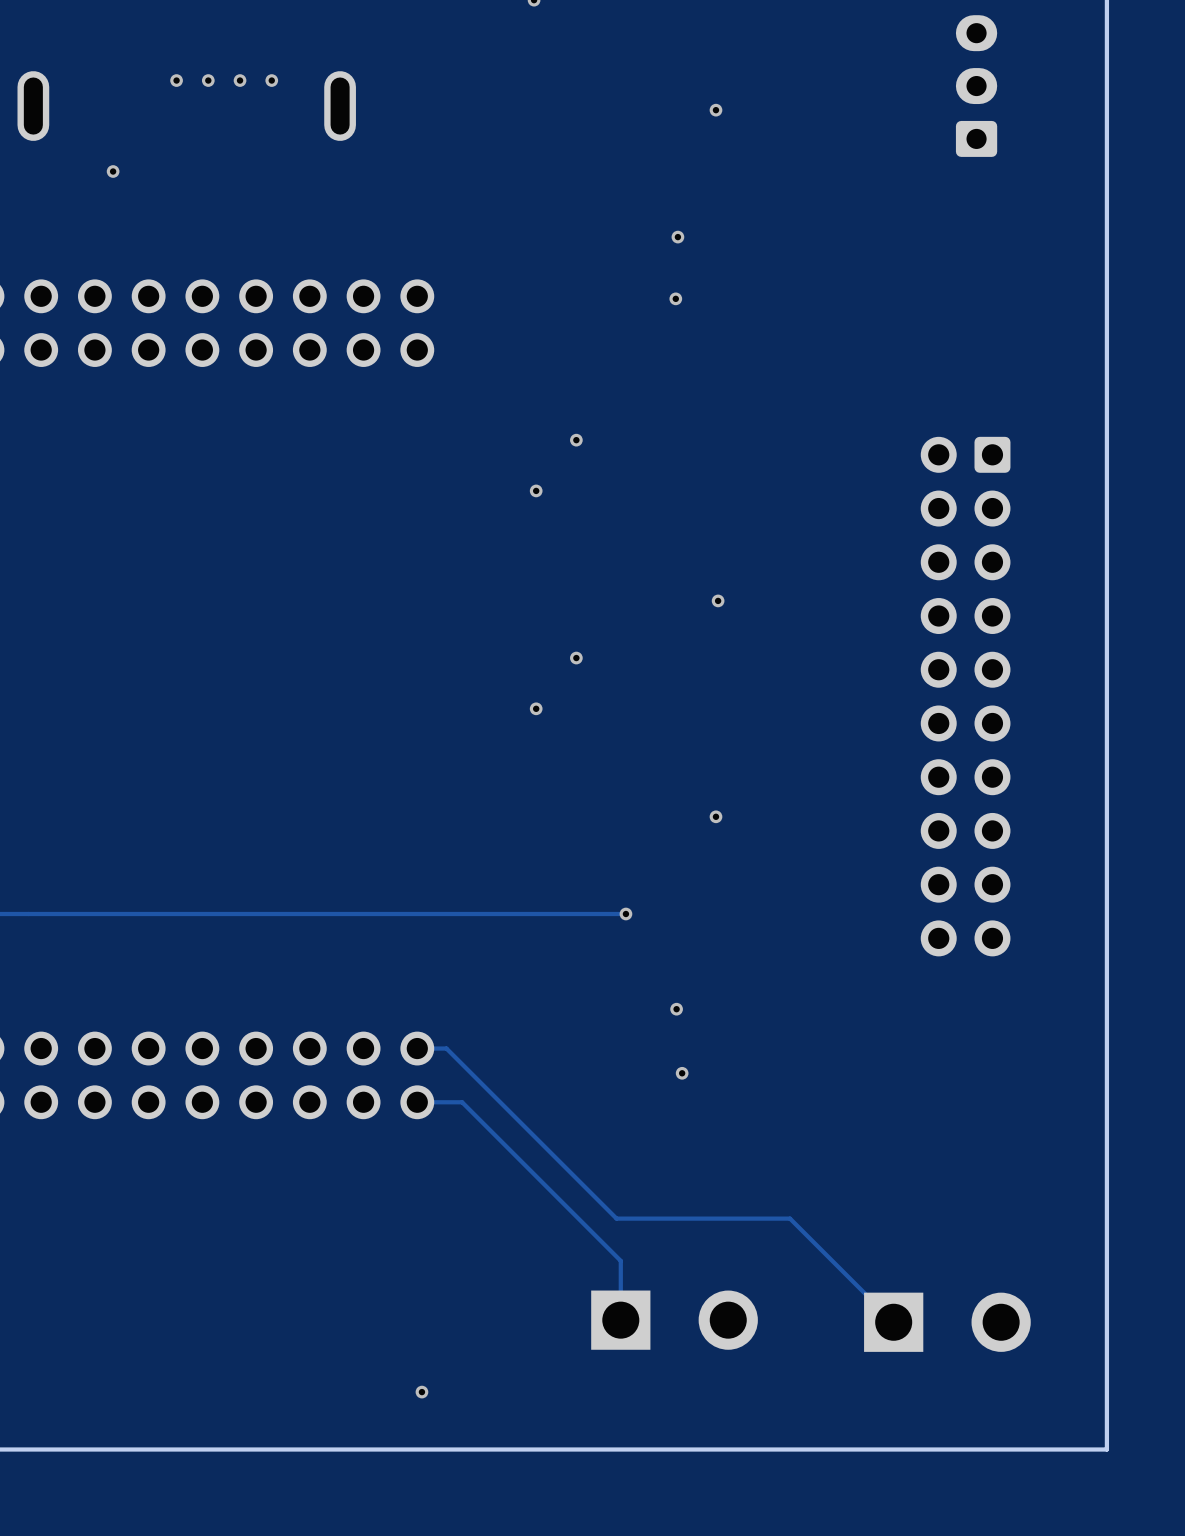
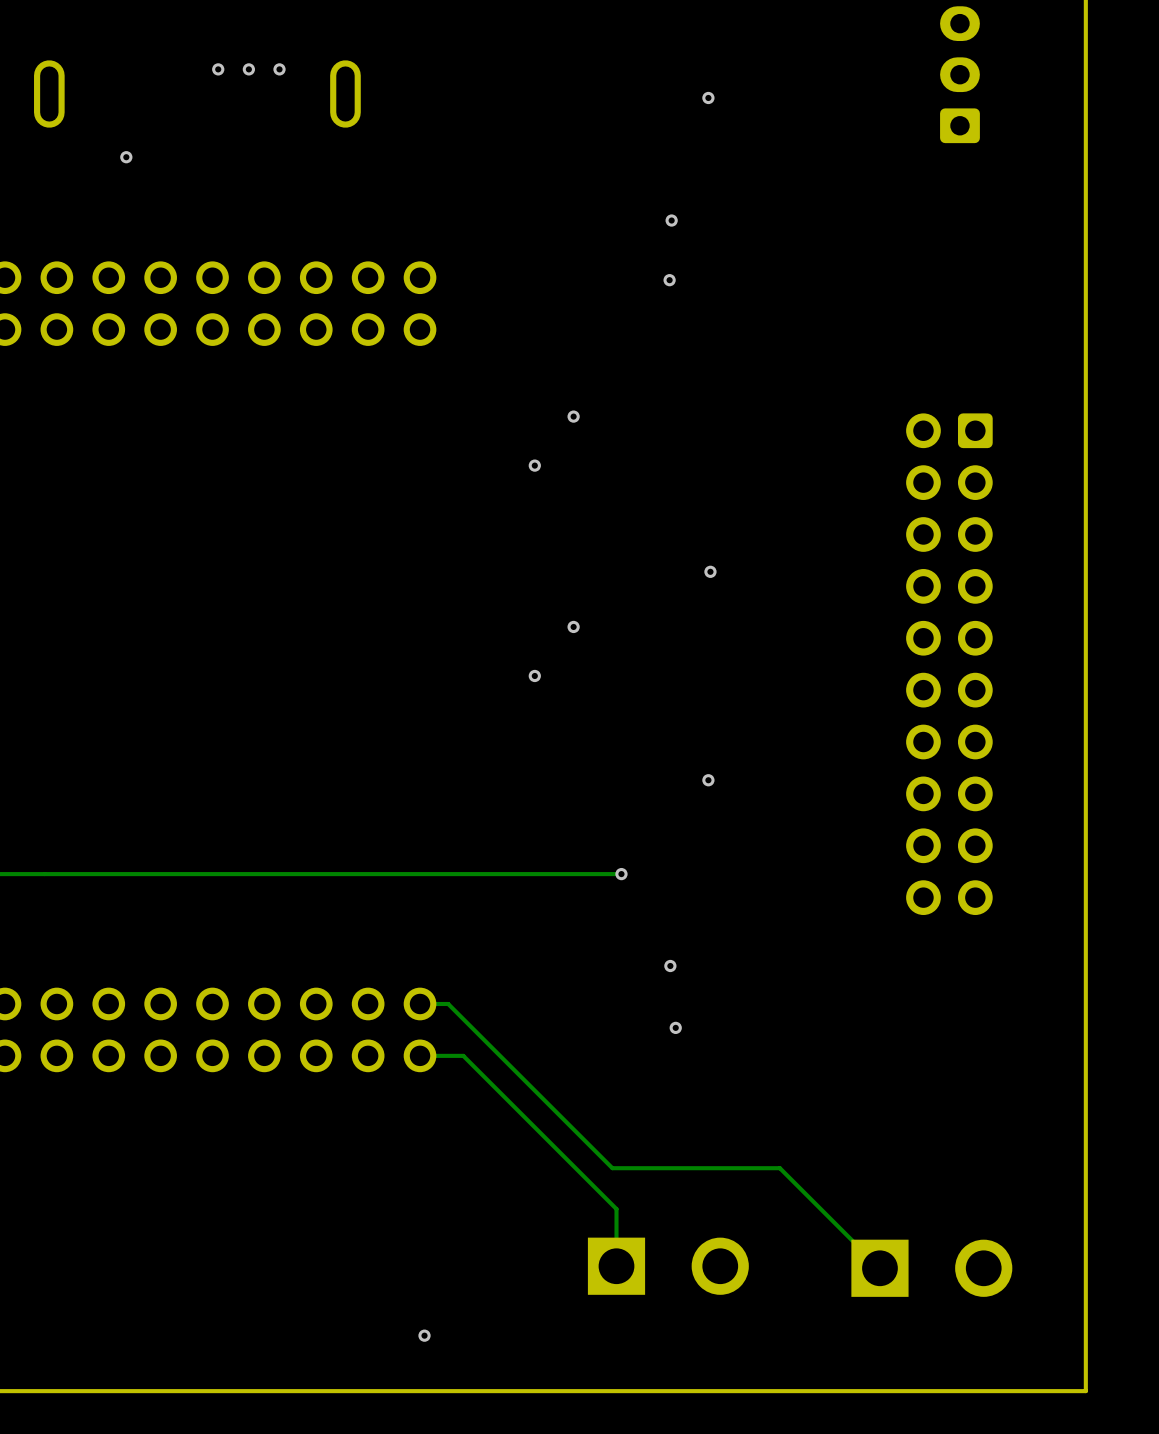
via: (176, 80) -> none

